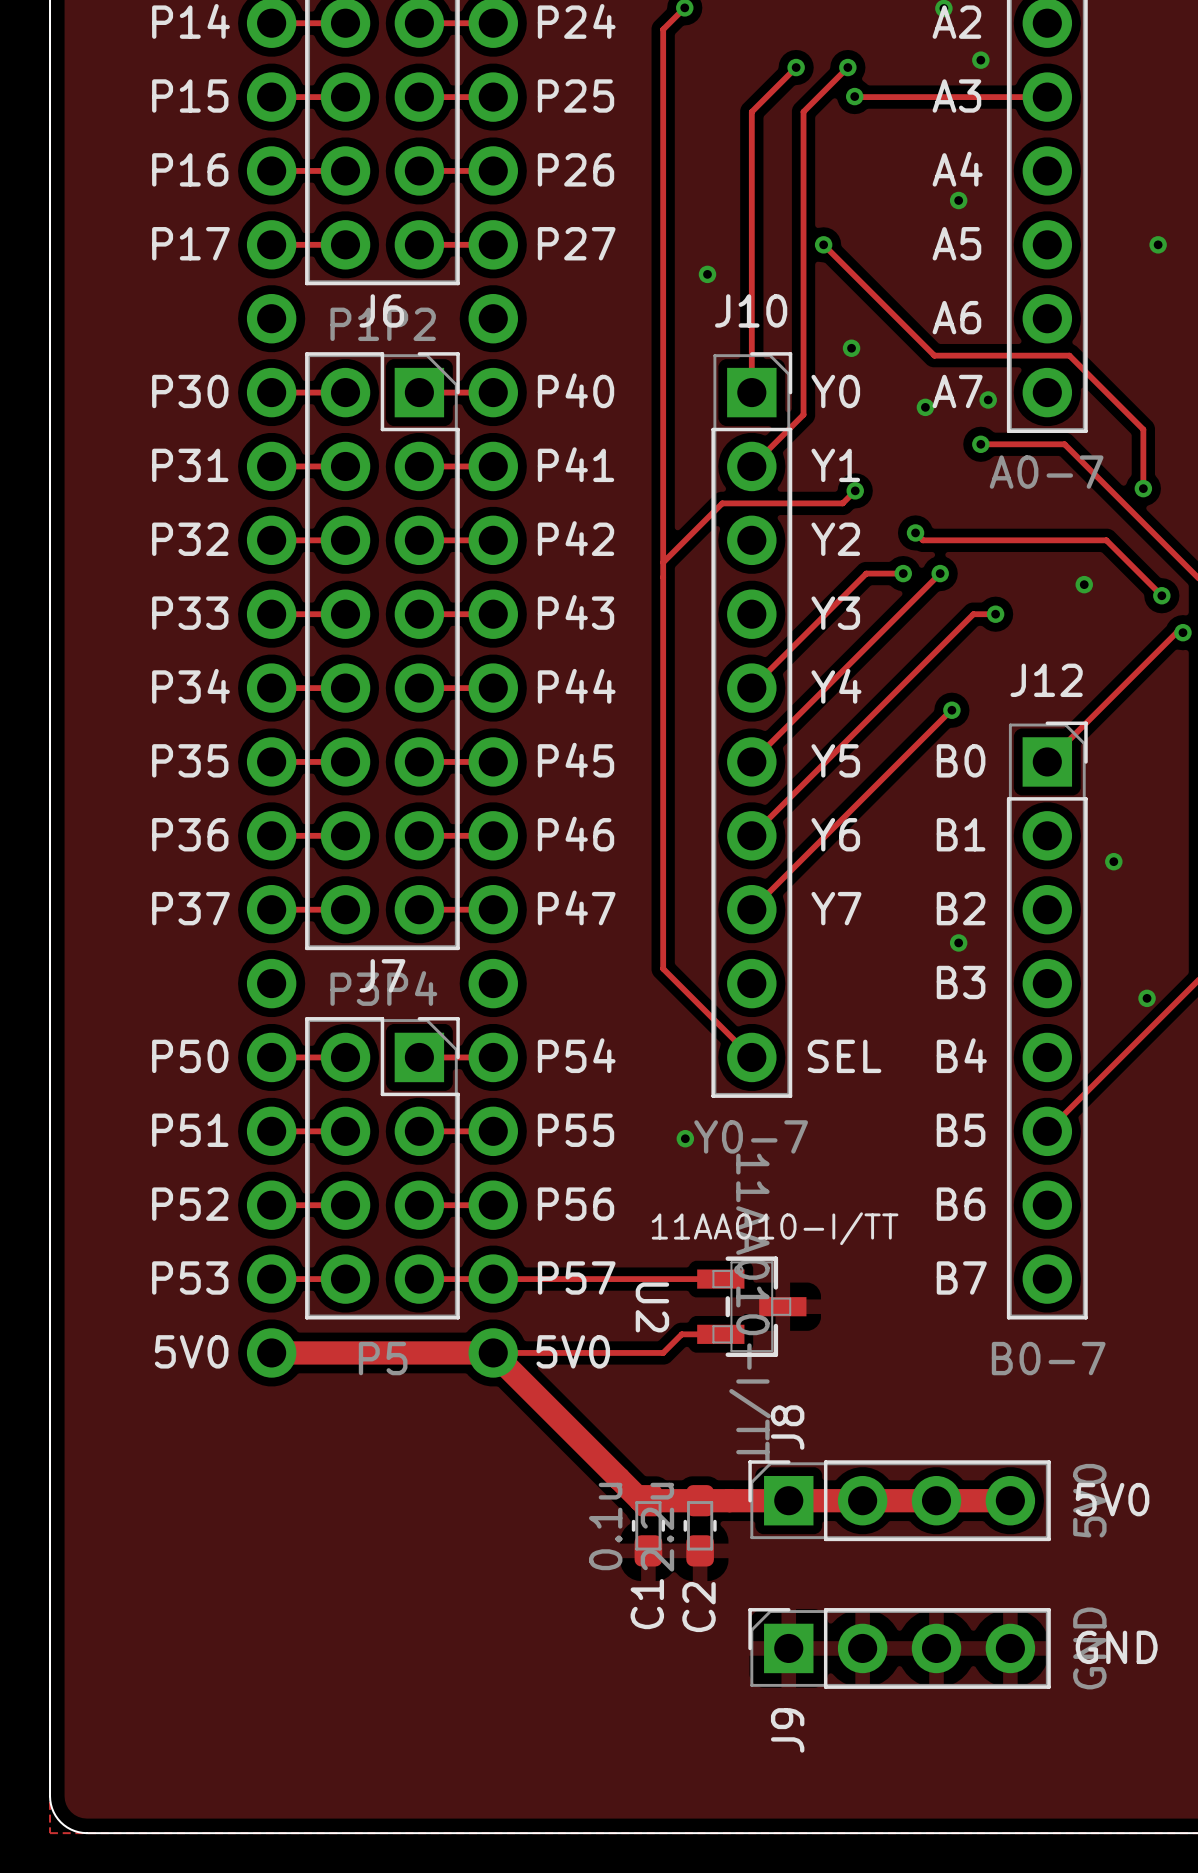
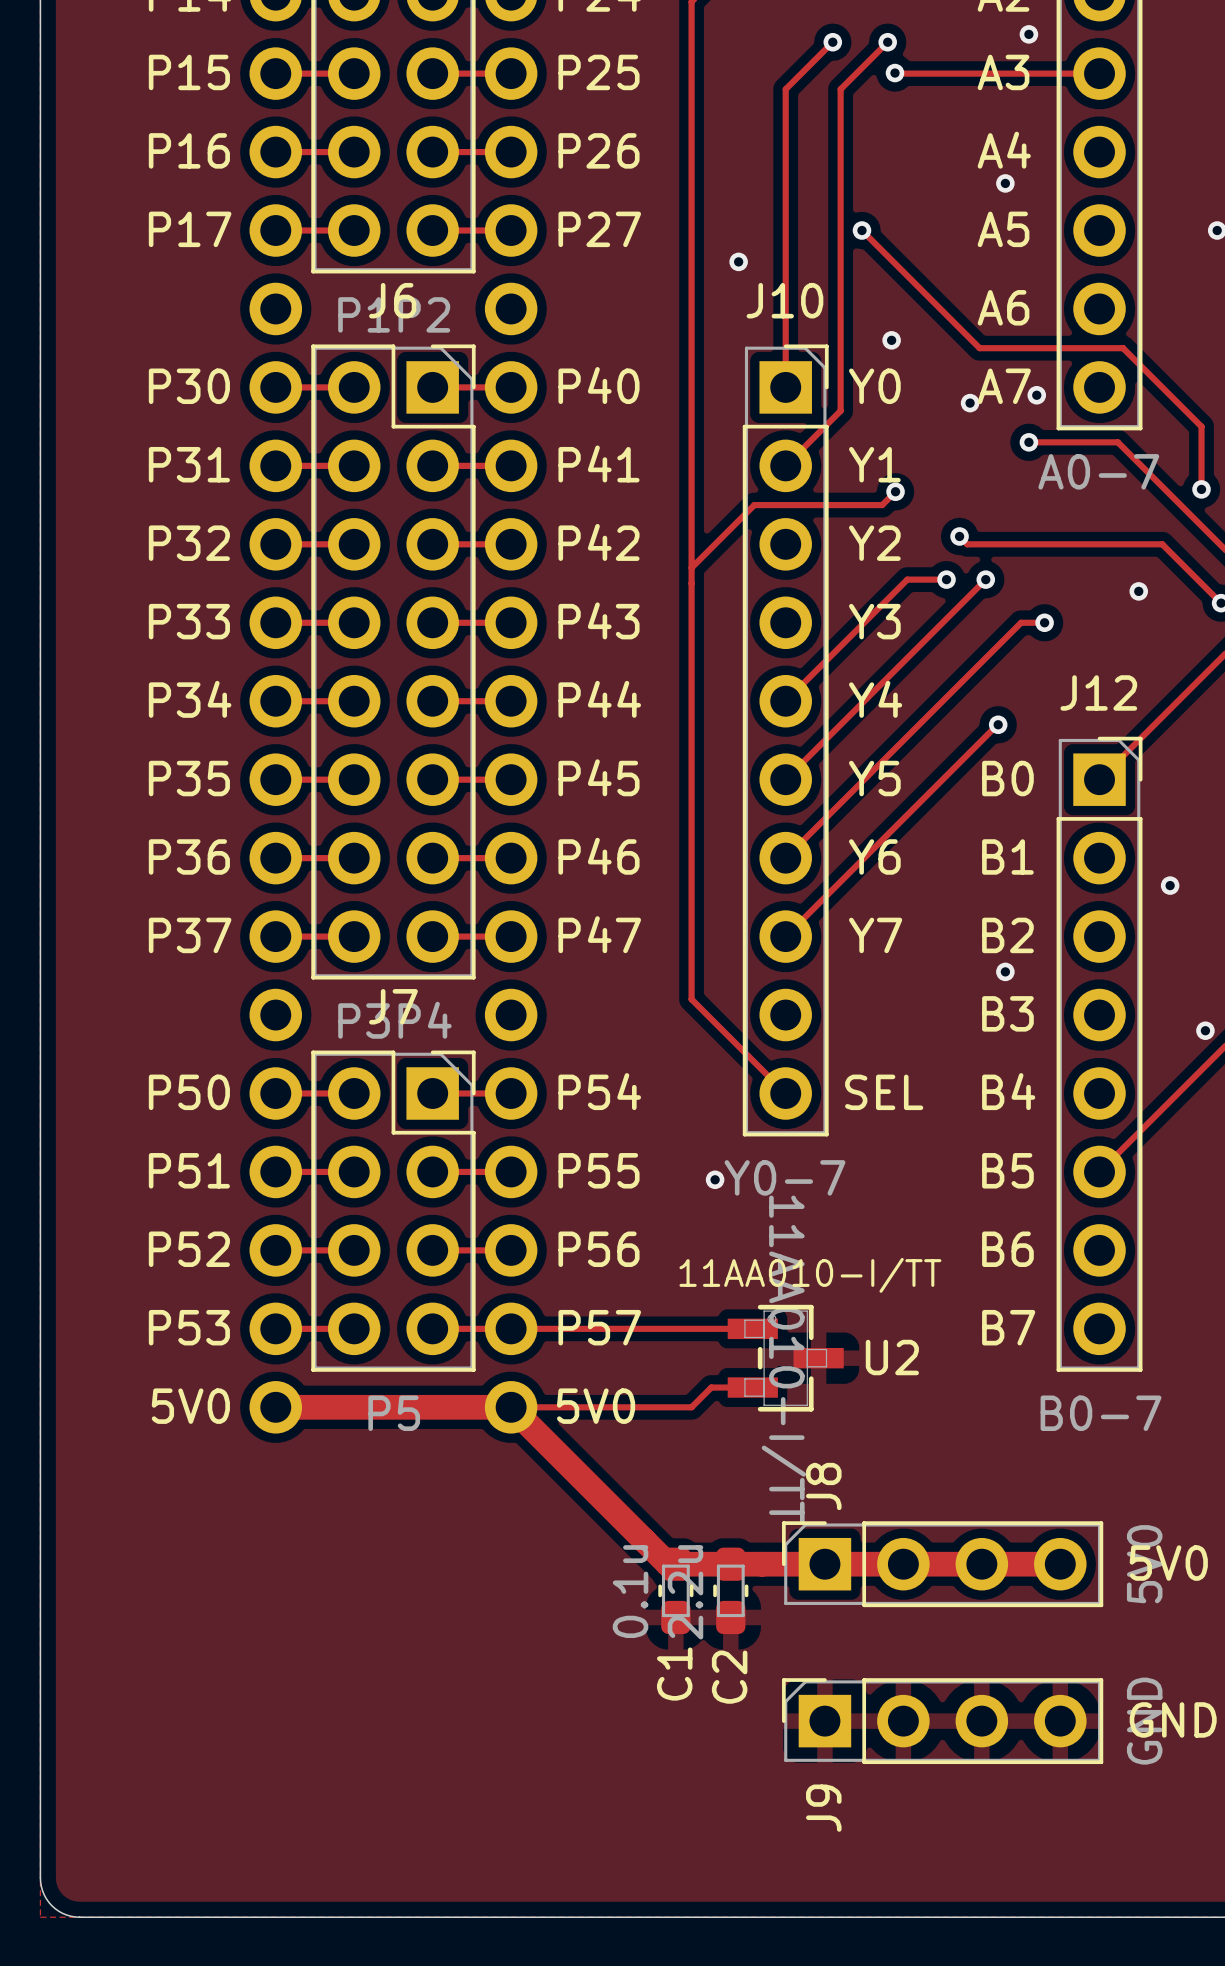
U2 name rotation: 0° (652, 1307) -> 90° counterclockwise (892, 1357)
U2 name position: U2 (652, 1307) -> U2 (892, 1357)

